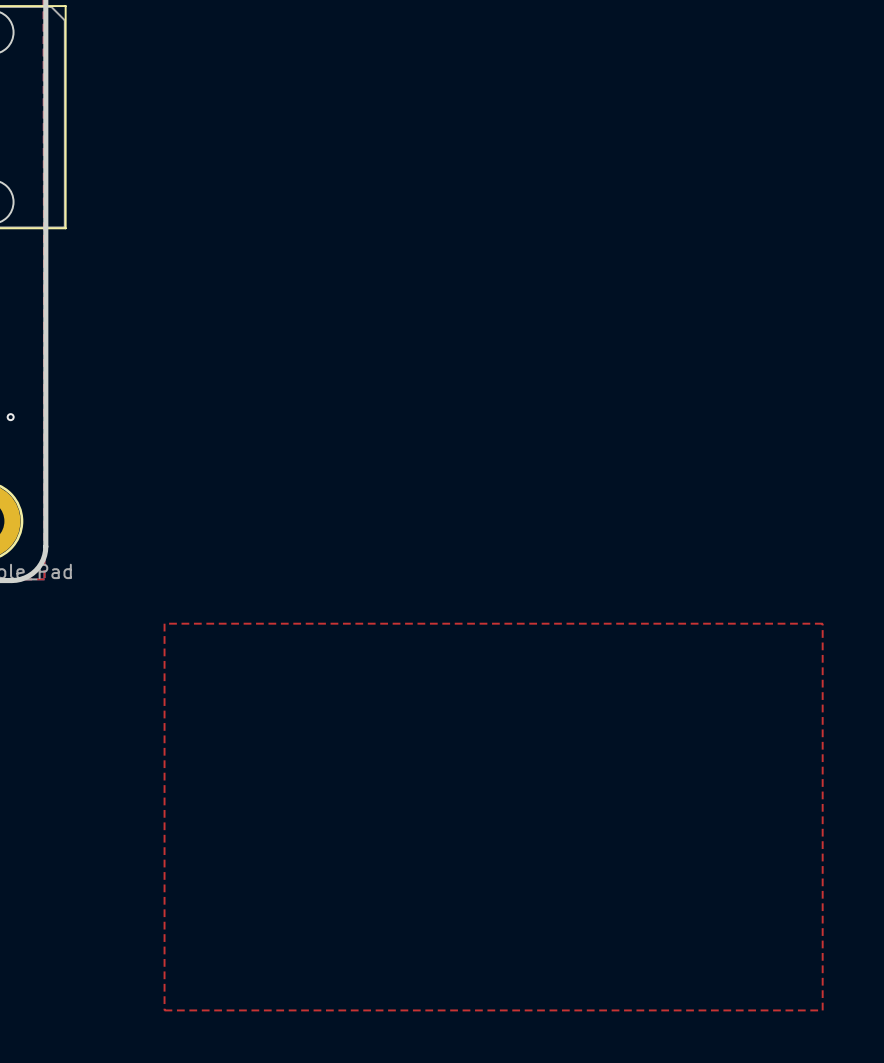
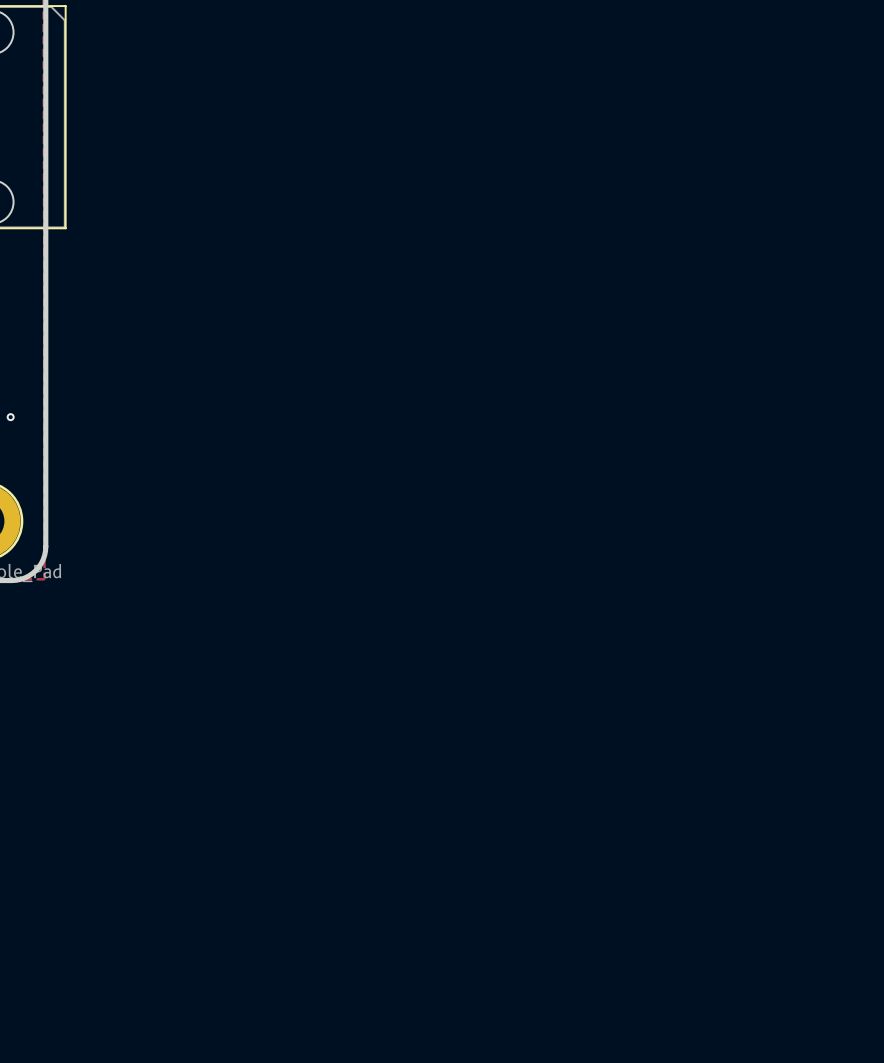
top zone outline: (164, 623) (822, 623) (822, 1010) (164, 1010) (164, 623) -> none

